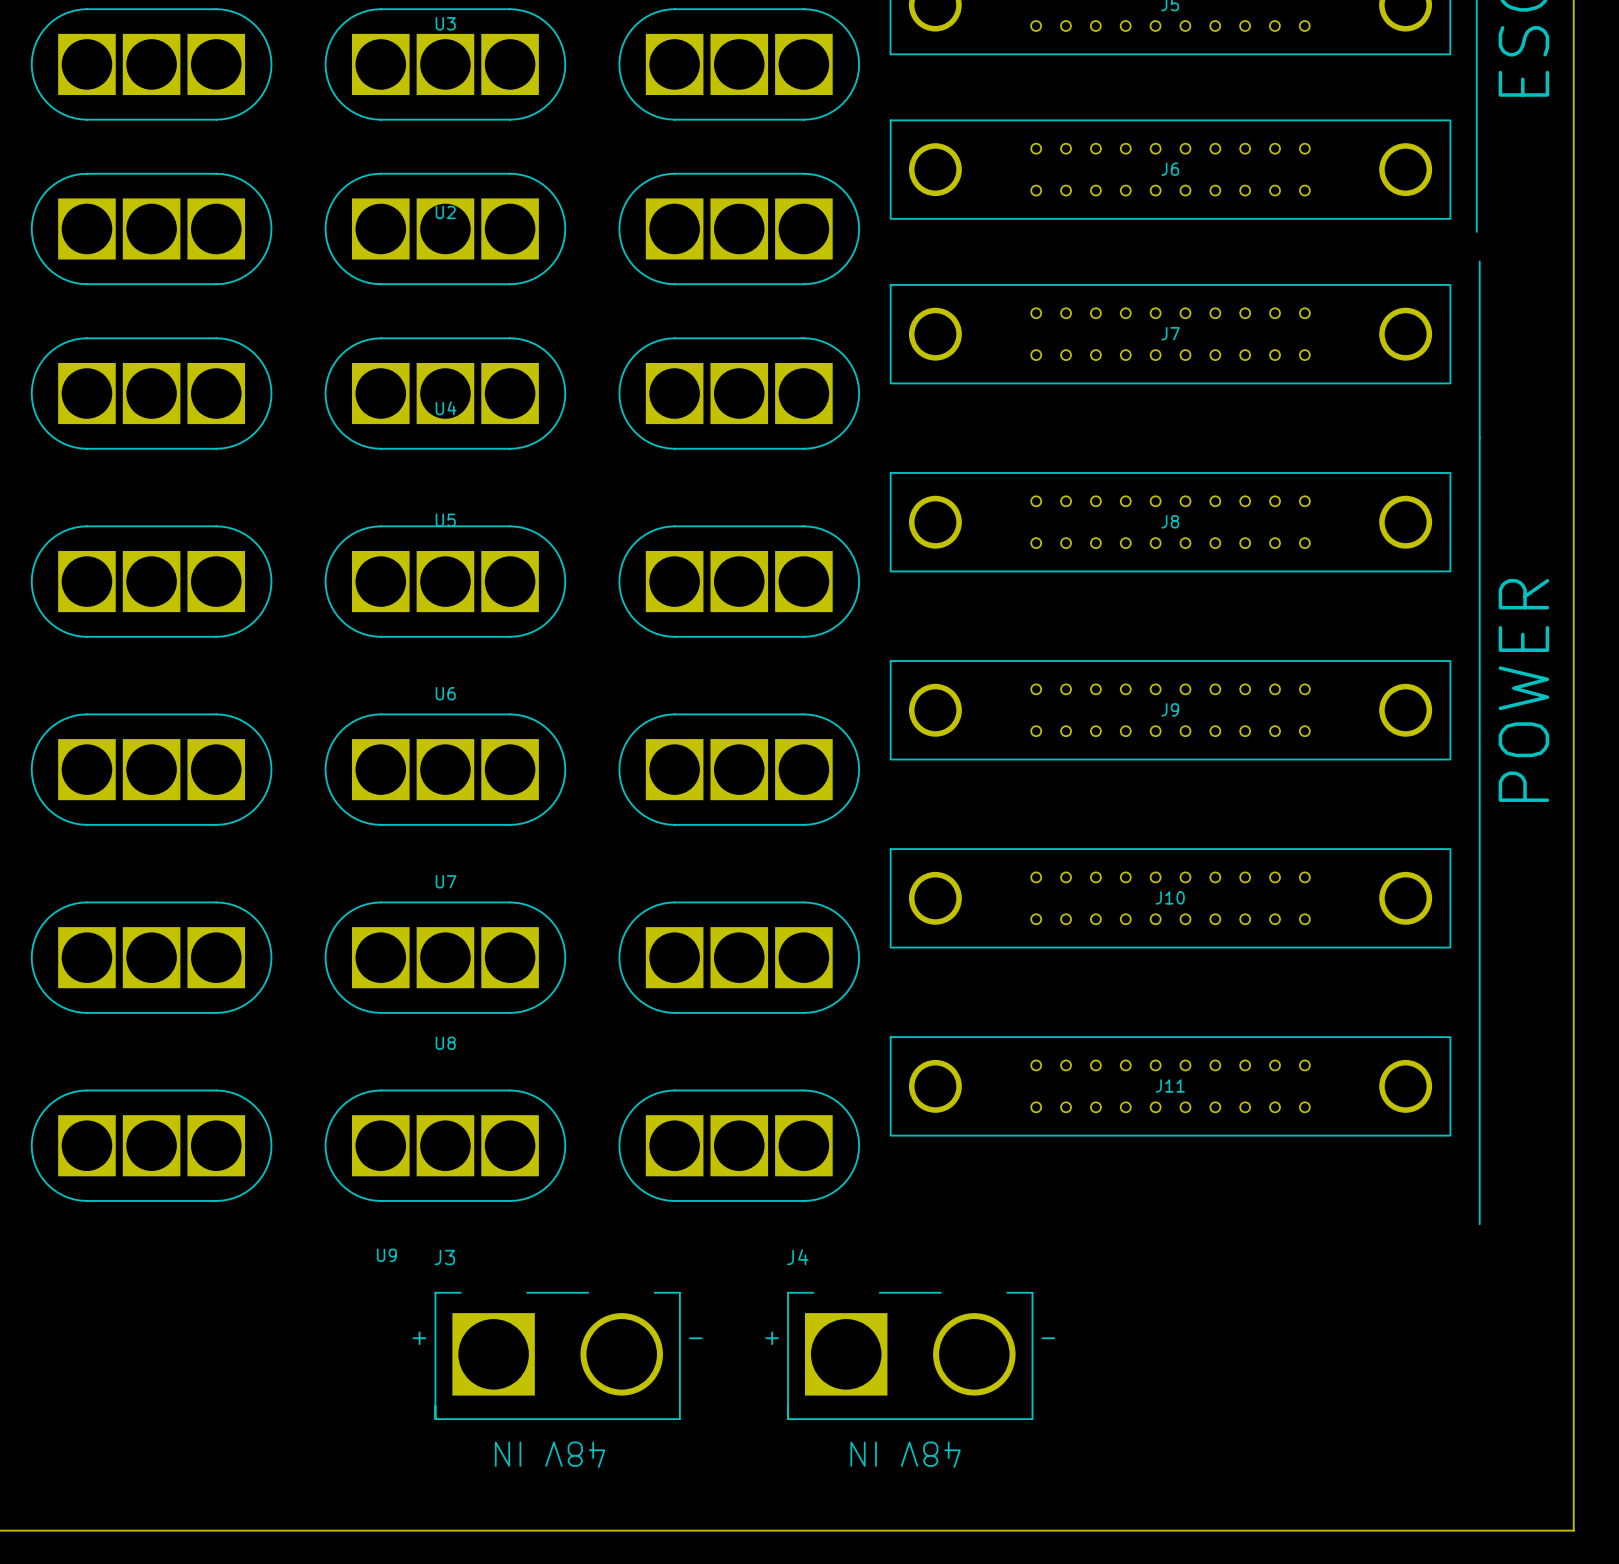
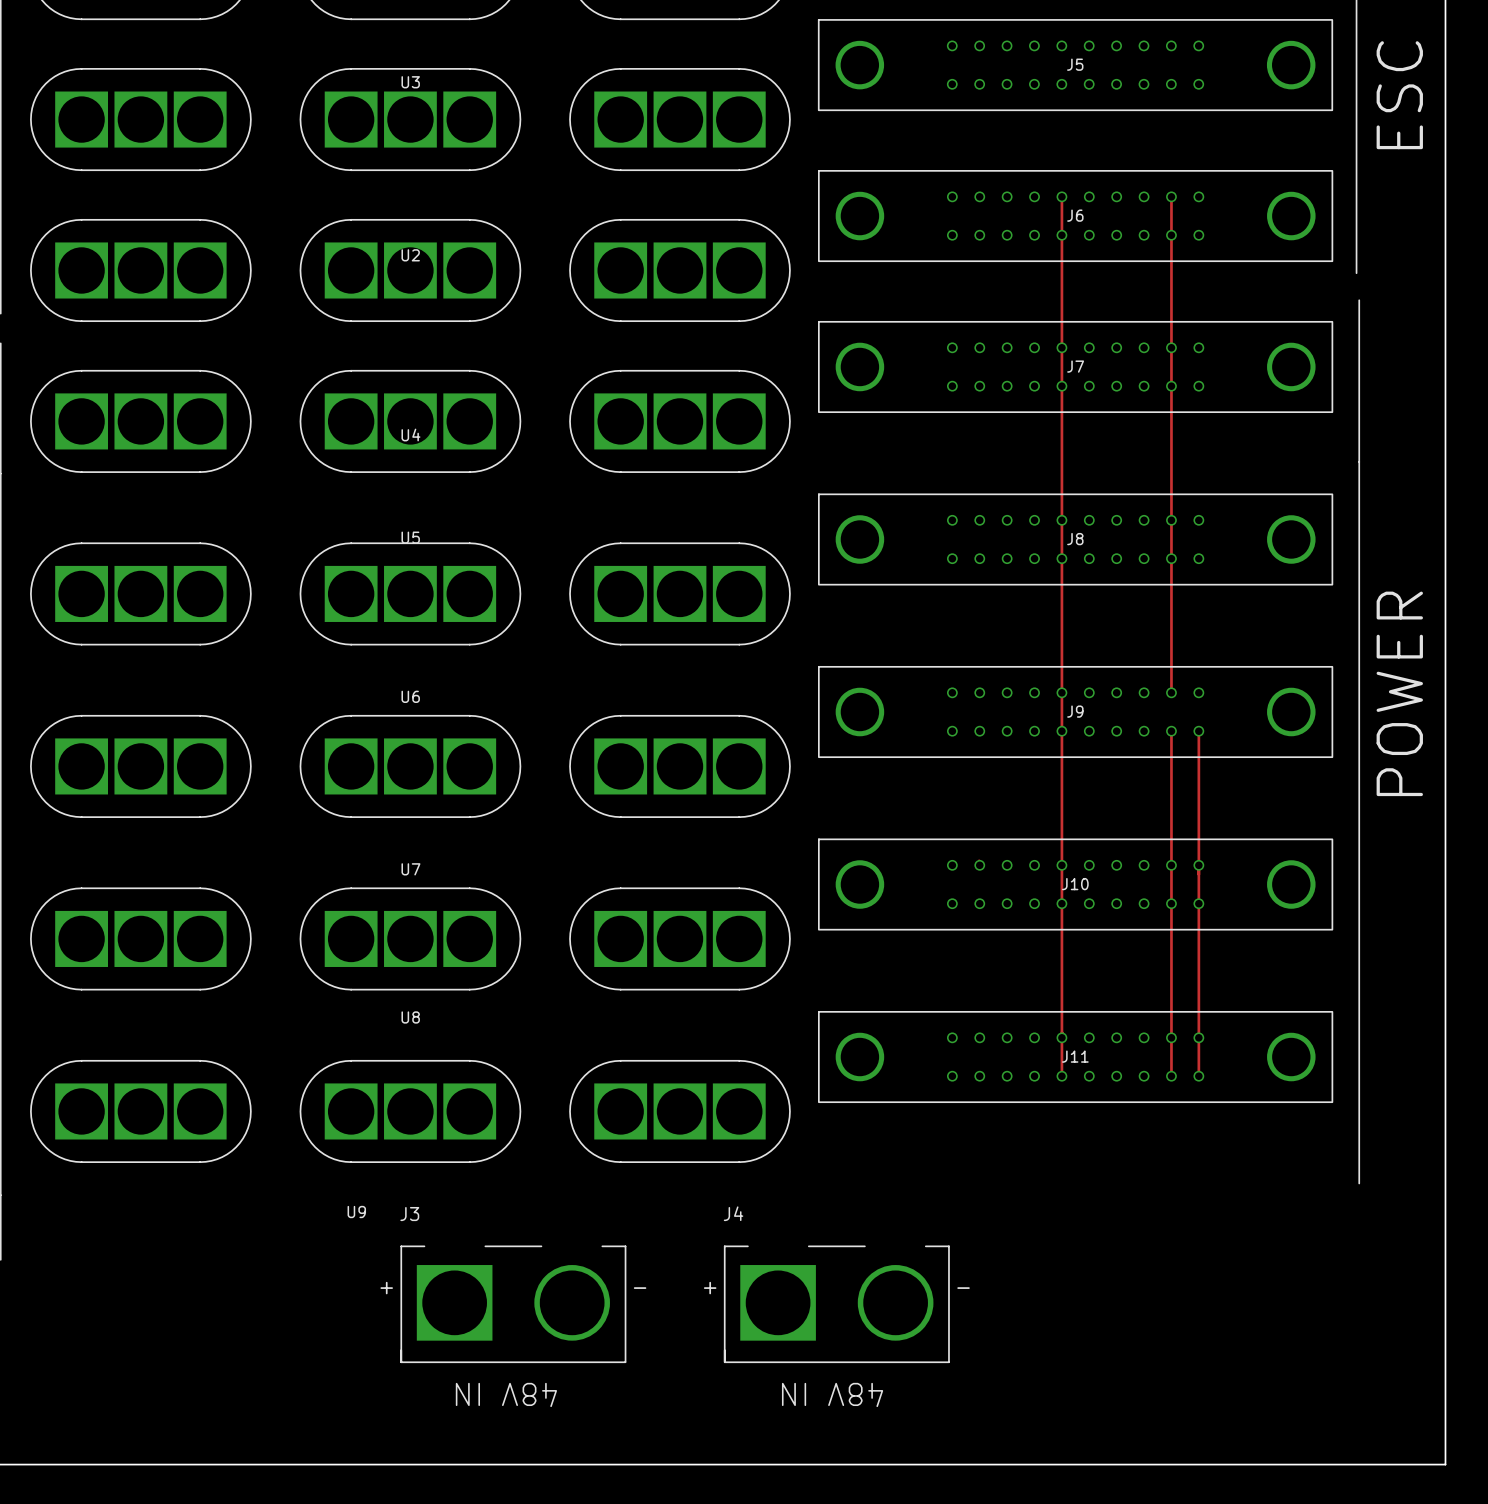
track: none -> (1061, 196) (1062, 1033)
track: none -> (1171, 196) (1171, 692)
track: none -> (1171, 731) (1171, 1076)
track: none -> (1198, 731) (1198, 1076)
track: none -> (1061, 1037) (1061, 1076)

